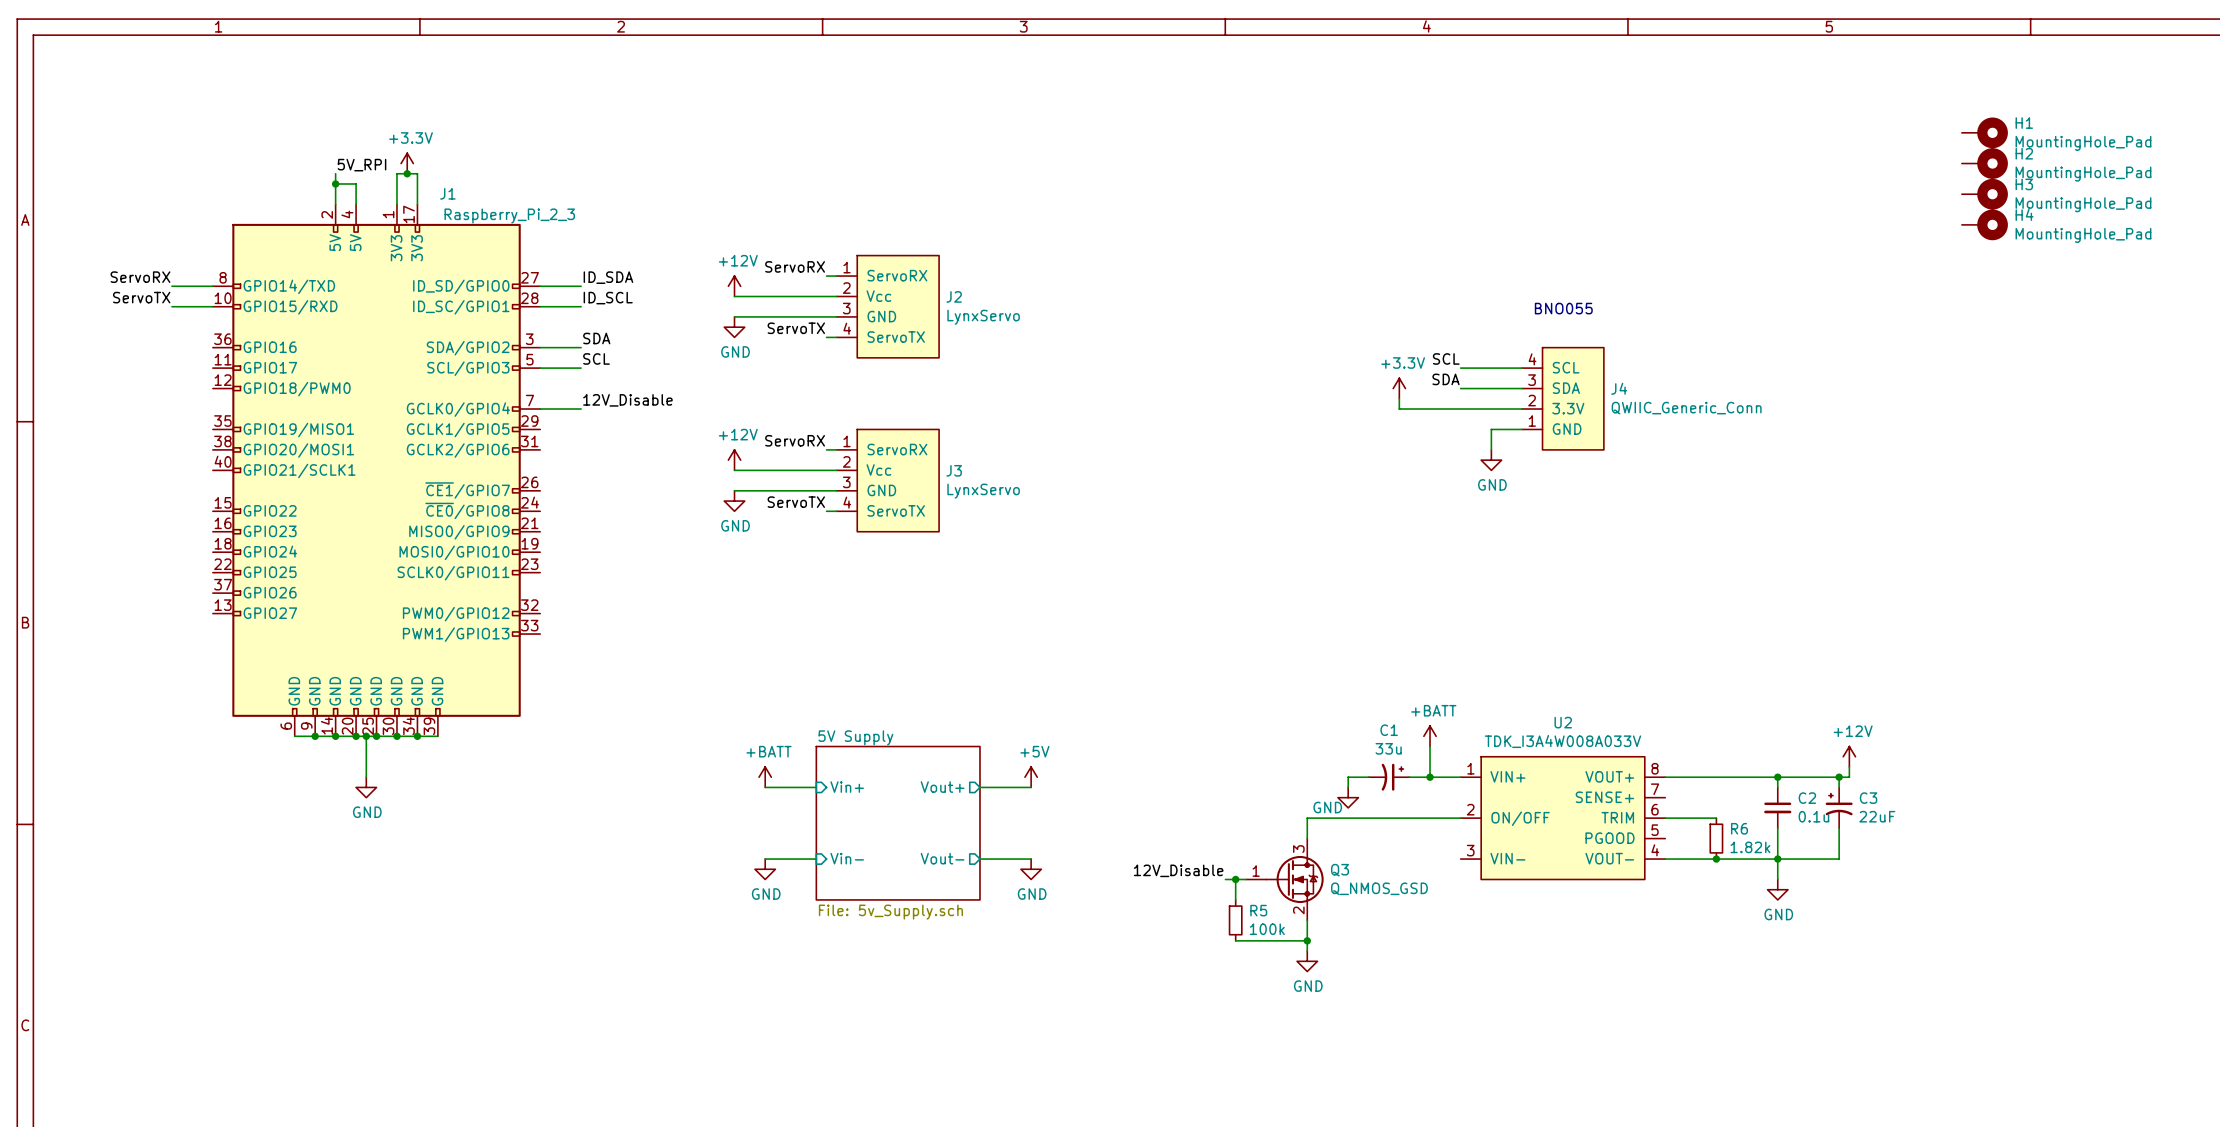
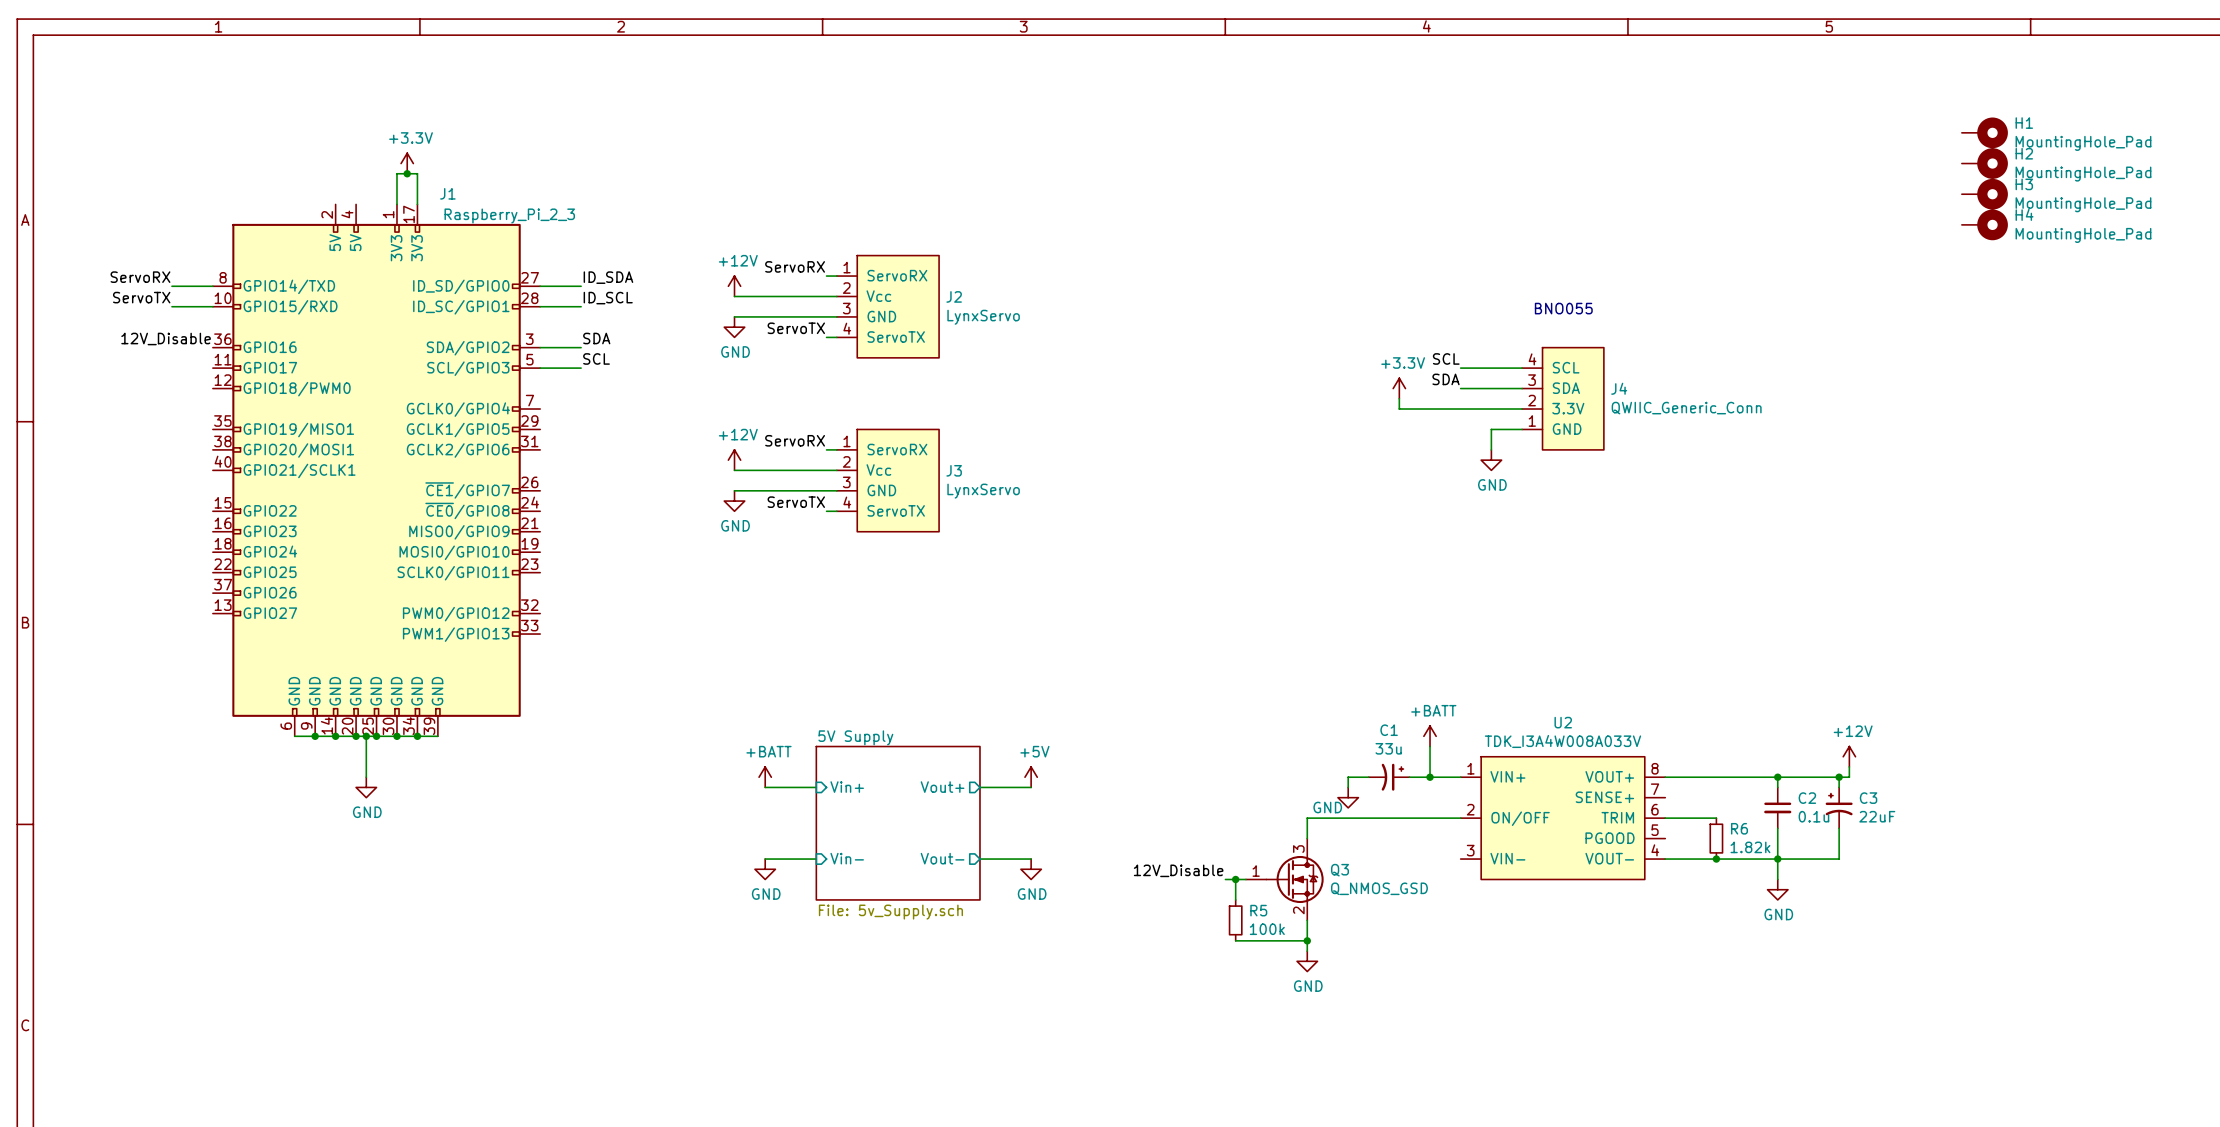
label: 5V_RPI (361, 165) -> none
wire: (335, 173) (335, 204) -> none
wire: (335, 183) (356, 183) (356, 204) -> none
junction: (335, 183) -> none
label: none -> 12V_Disable (166, 339)
label: 12V_Disable (627, 400) -> none
wire: (540, 409) (581, 409) -> none

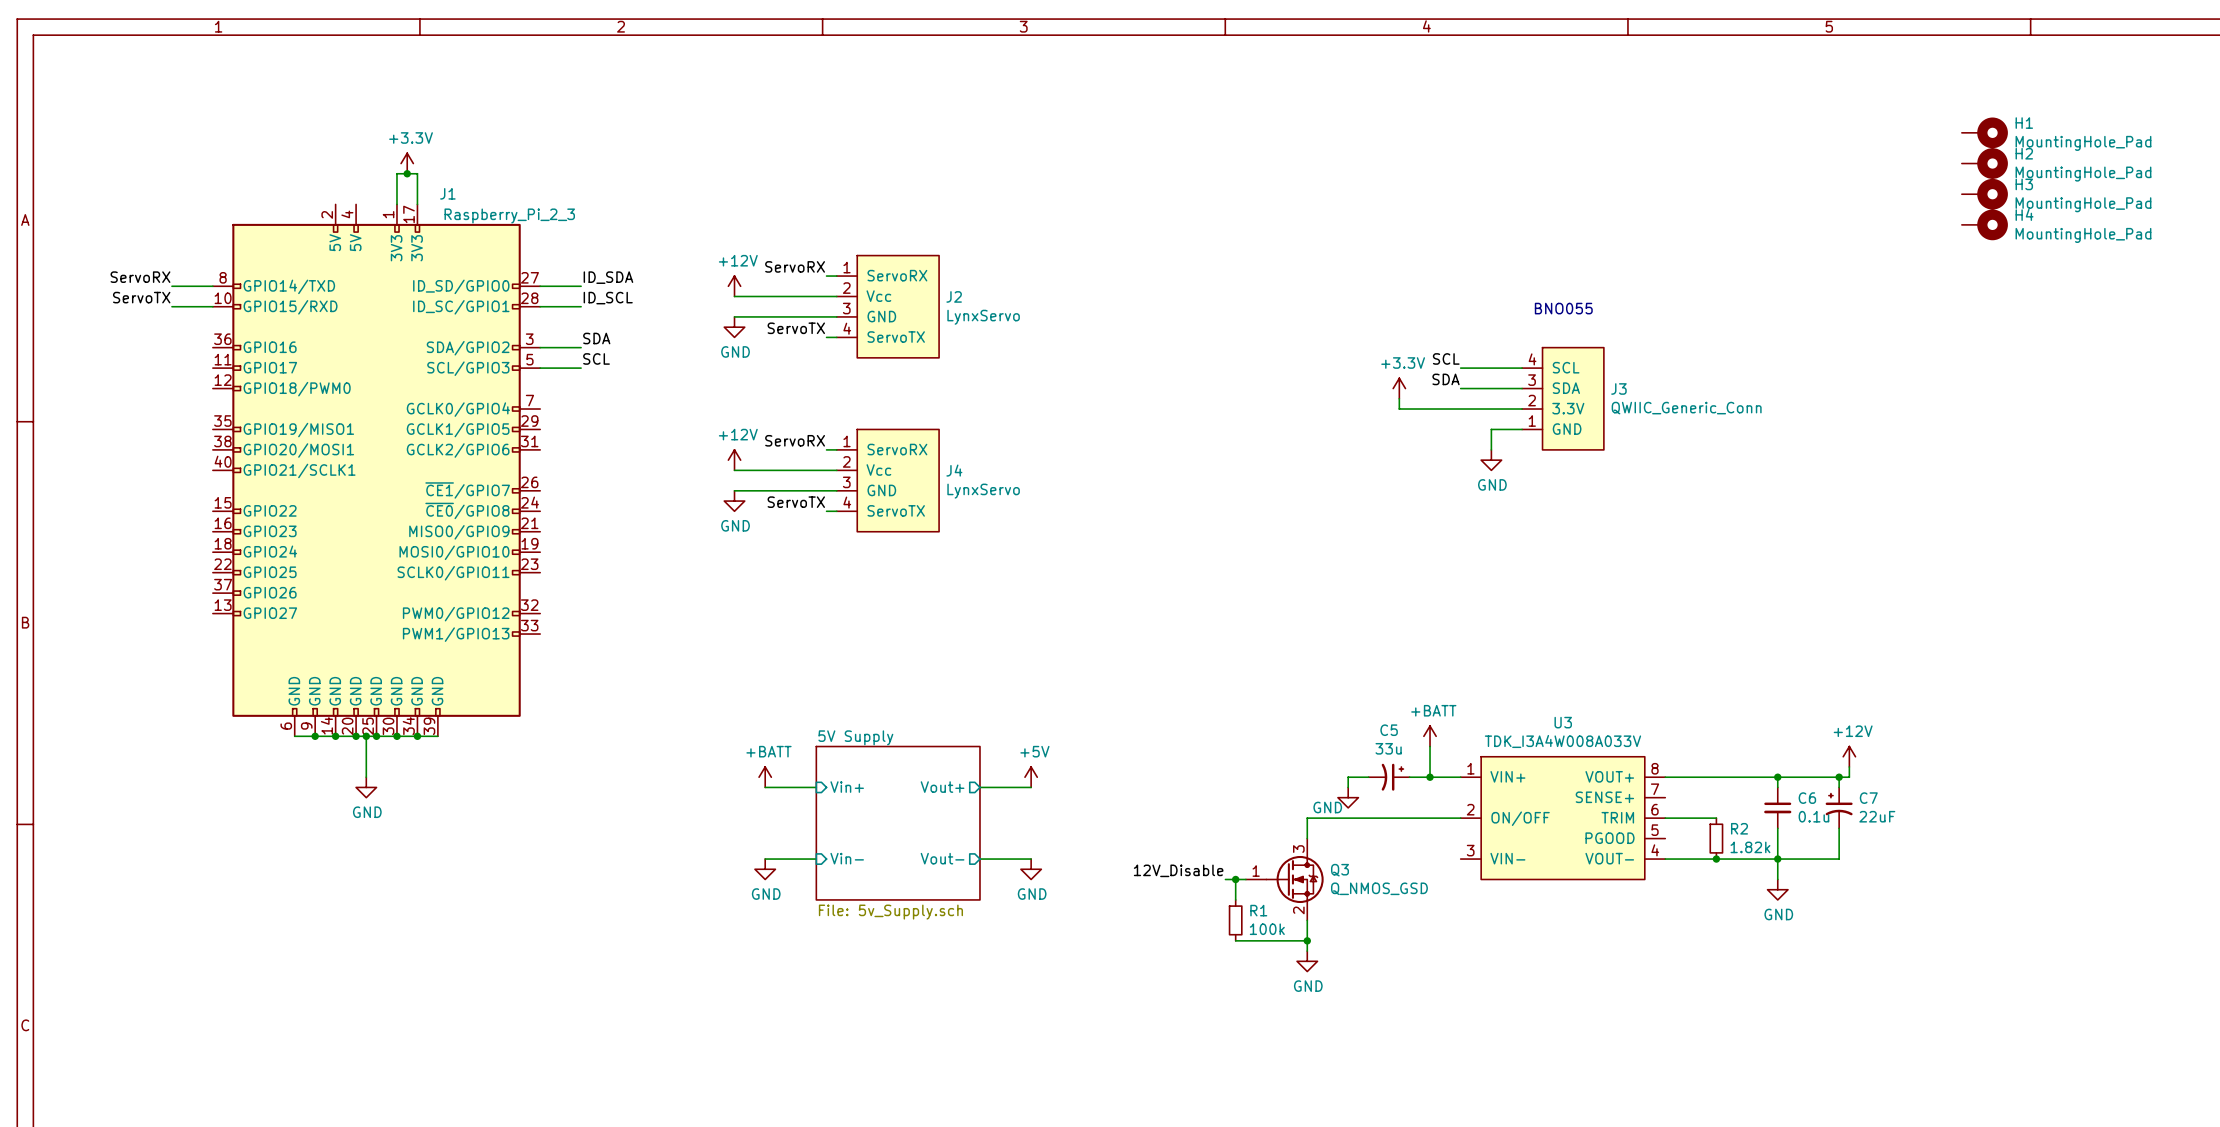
label: 12V_Disable (166, 339) -> none
J4 name: J4 (1619, 388) -> J3 (1618, 388)
J3 name: J3 (954, 470) -> J4 (954, 470)
U2 name: U2 (1563, 722) -> U3 (1563, 722)
C1 name: C1 (1389, 730) -> C5 (1389, 730)
C2 name: C2 (1807, 798) -> C6 (1807, 798)
C3 name: C3 (1868, 798) -> C7 (1868, 798)
R6 name: R6 (1739, 828) -> R2 (1739, 828)
R5 name: R5 (1258, 910) -> R1 (1258, 910)

